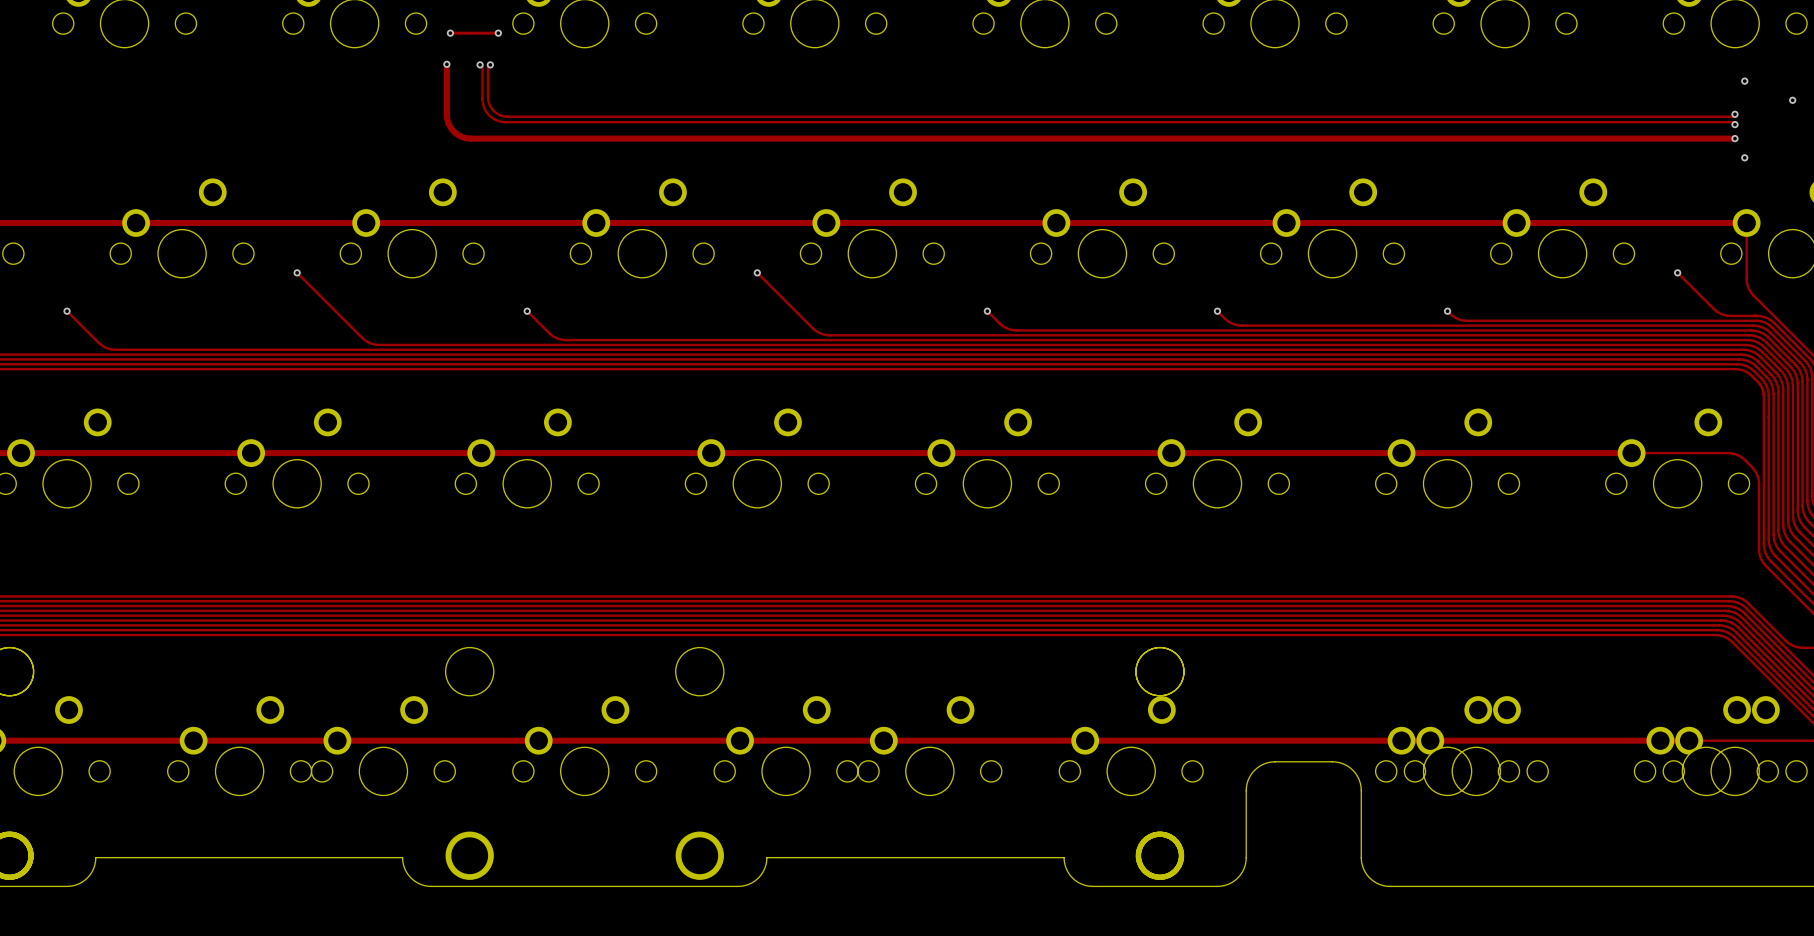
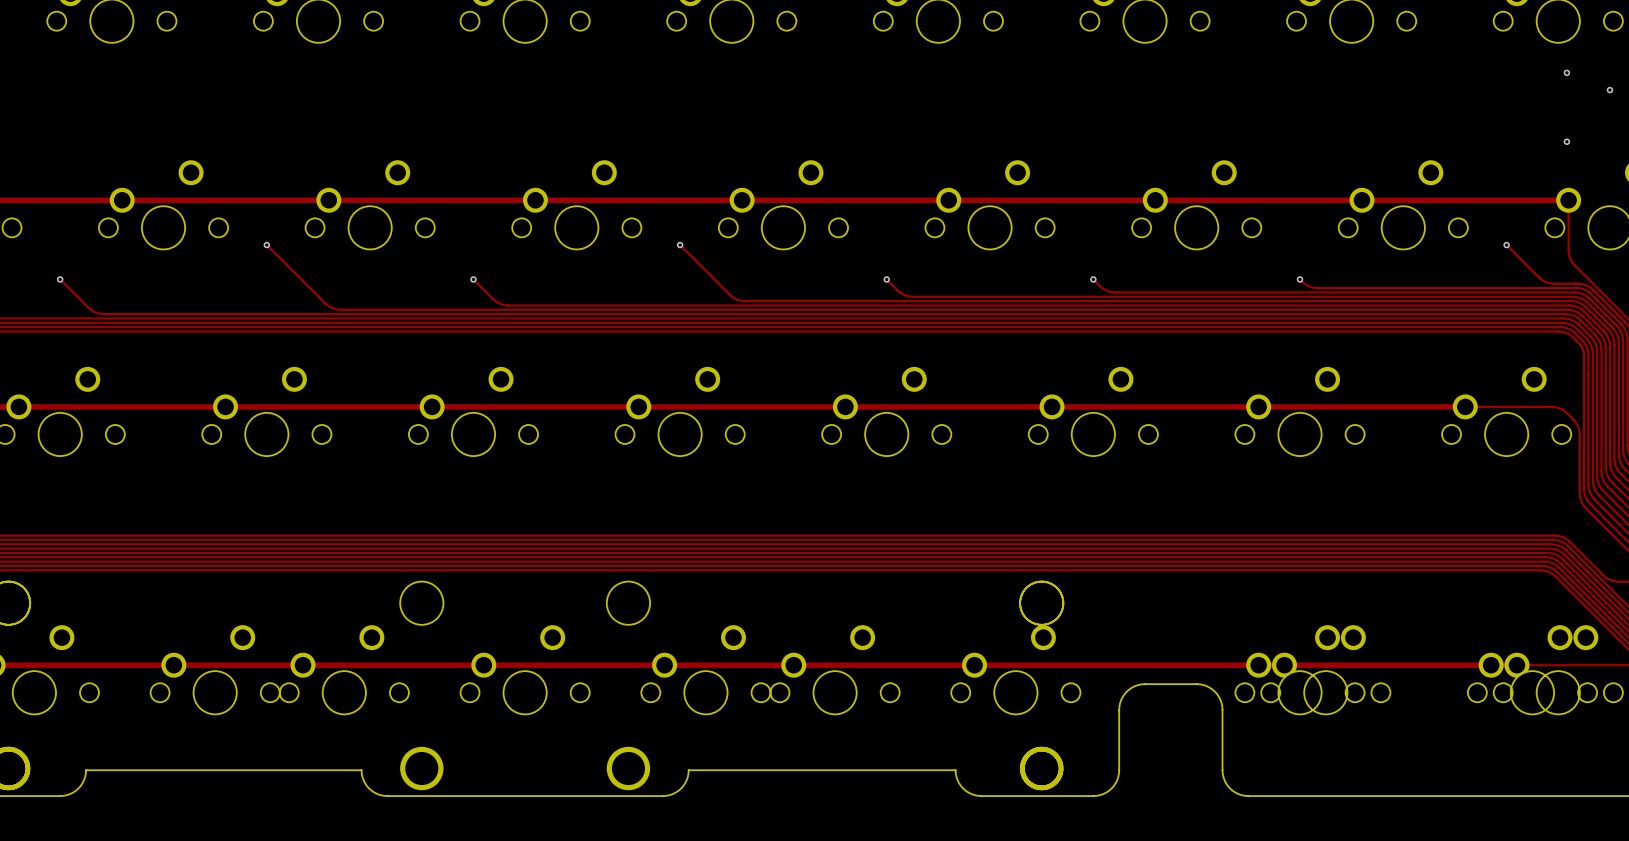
track: (450, 33) (498, 33) -> none
via: (450, 33) -> none
via: (498, 33) -> none
track: (446, 64) (447, 120) (455, 133) (468, 138) (1734, 138) -> none
via: (446, 64) -> none
track: (480, 64) (482, 67) (482, 99) (484, 109) (493, 118) (505, 122) (1732, 122) (1734, 124) -> none
via: (480, 64) -> none
track: (490, 64) (487, 67) (488, 102) (495, 112) (507, 116) (1732, 116) (1734, 114) -> none
via: (490, 64) -> none
via: (1734, 114) -> none
via: (1734, 124) -> none
via: (1734, 138) -> none

